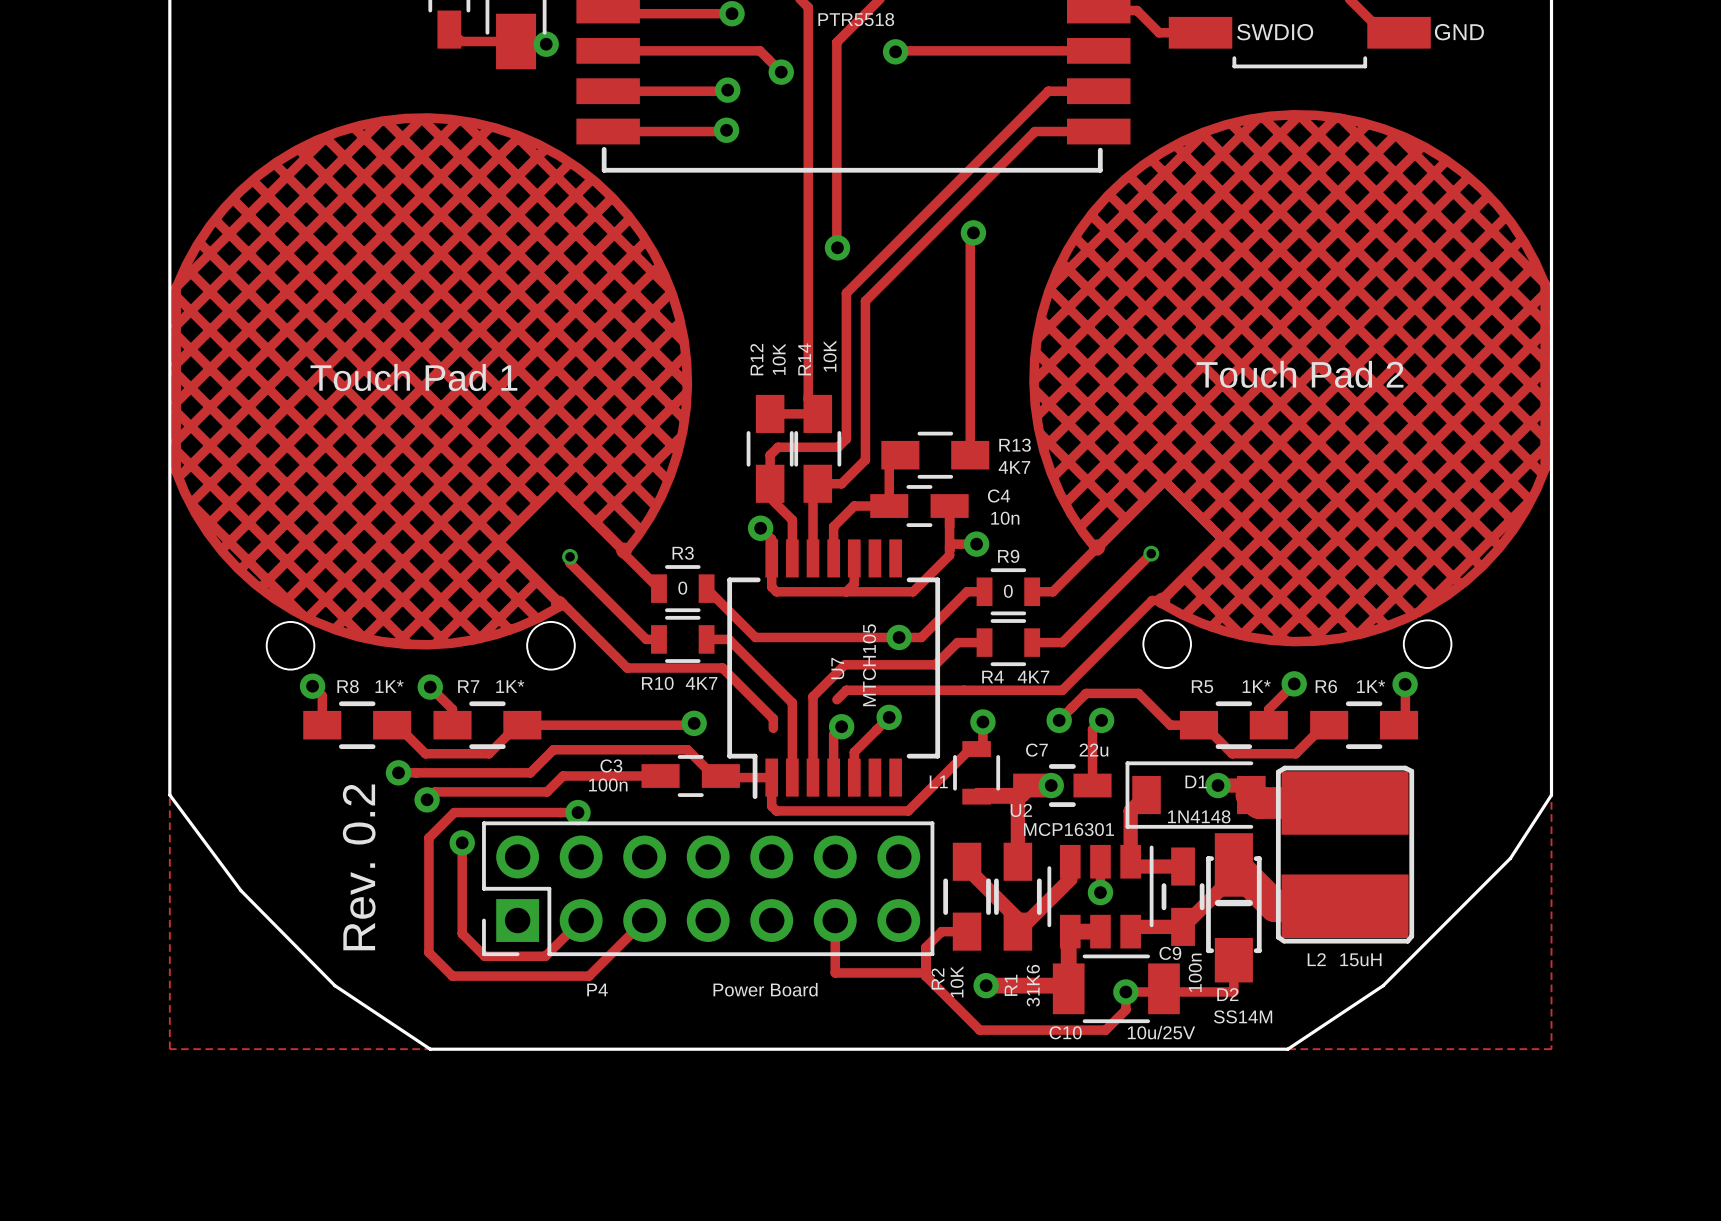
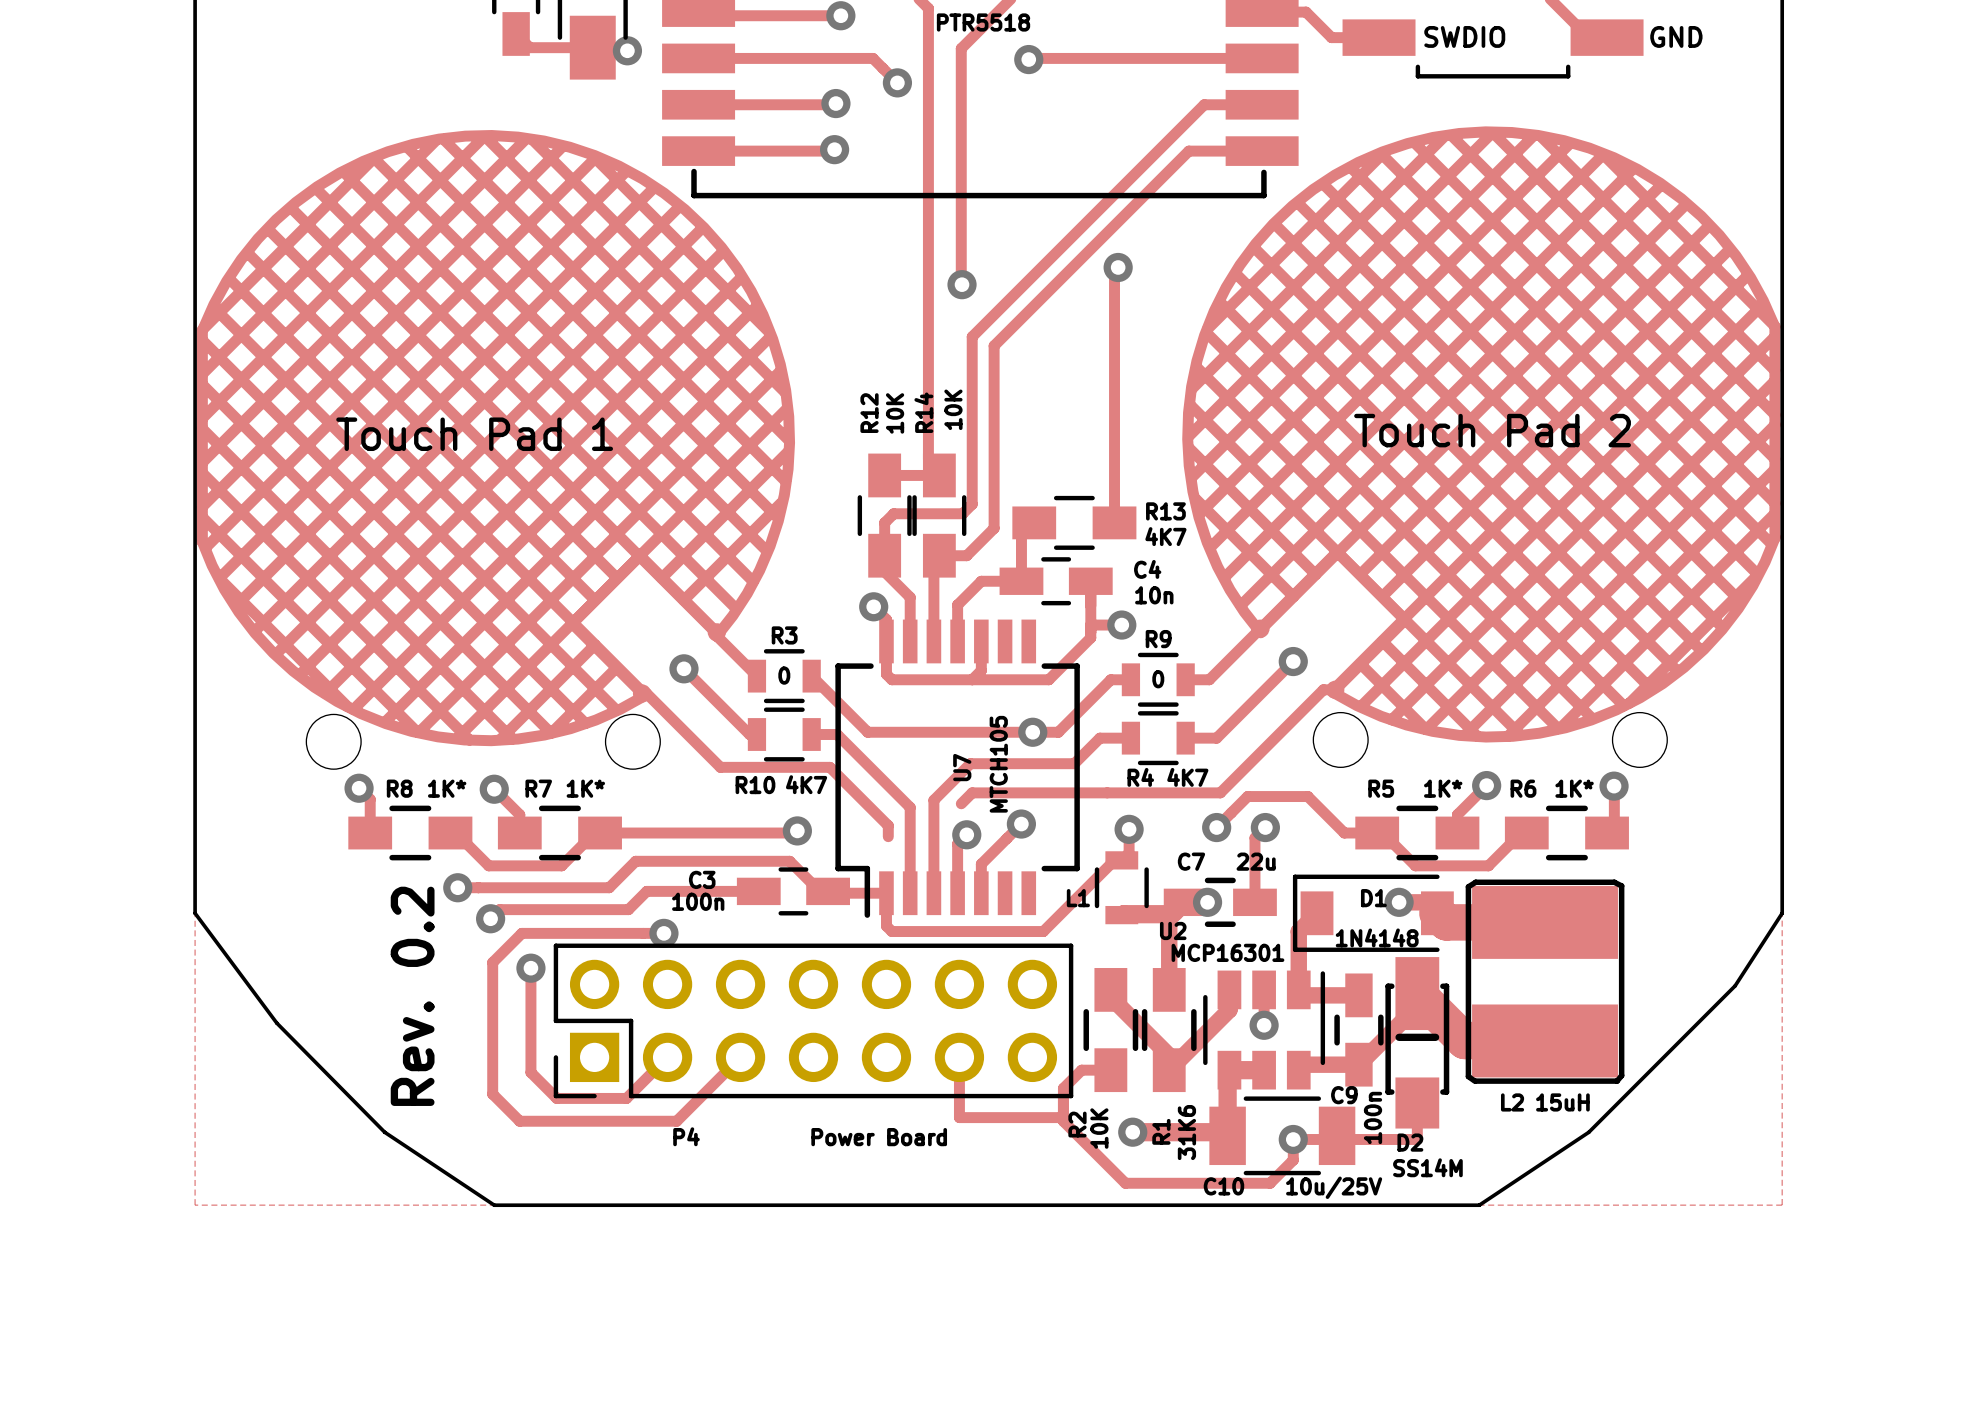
part footprint: [1029, 110, 1551, 647] -> [1182, 126, 1781, 743]
part footprint: [171, 113, 693, 650] -> [196, 130, 796, 747]
track: (1151, 553) (1062, 642) (1059, 642) -> (1293, 661) (1216, 738)
track: (570, 556) (570, 563) (646, 639) (652, 639) -> (683, 668) (749, 734)
via: none -> (1293, 661)
via: none -> (683, 668)

